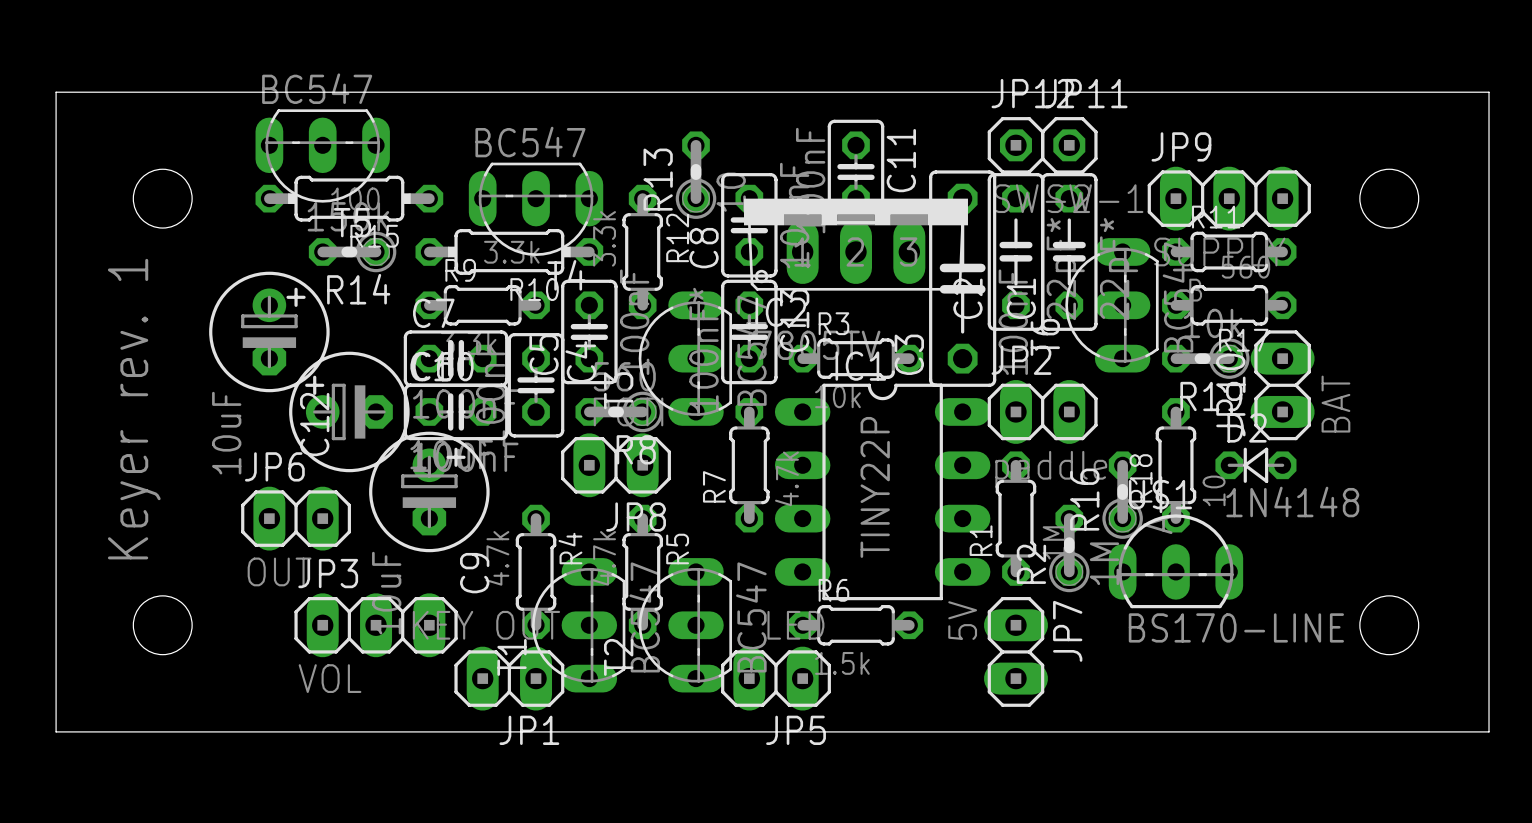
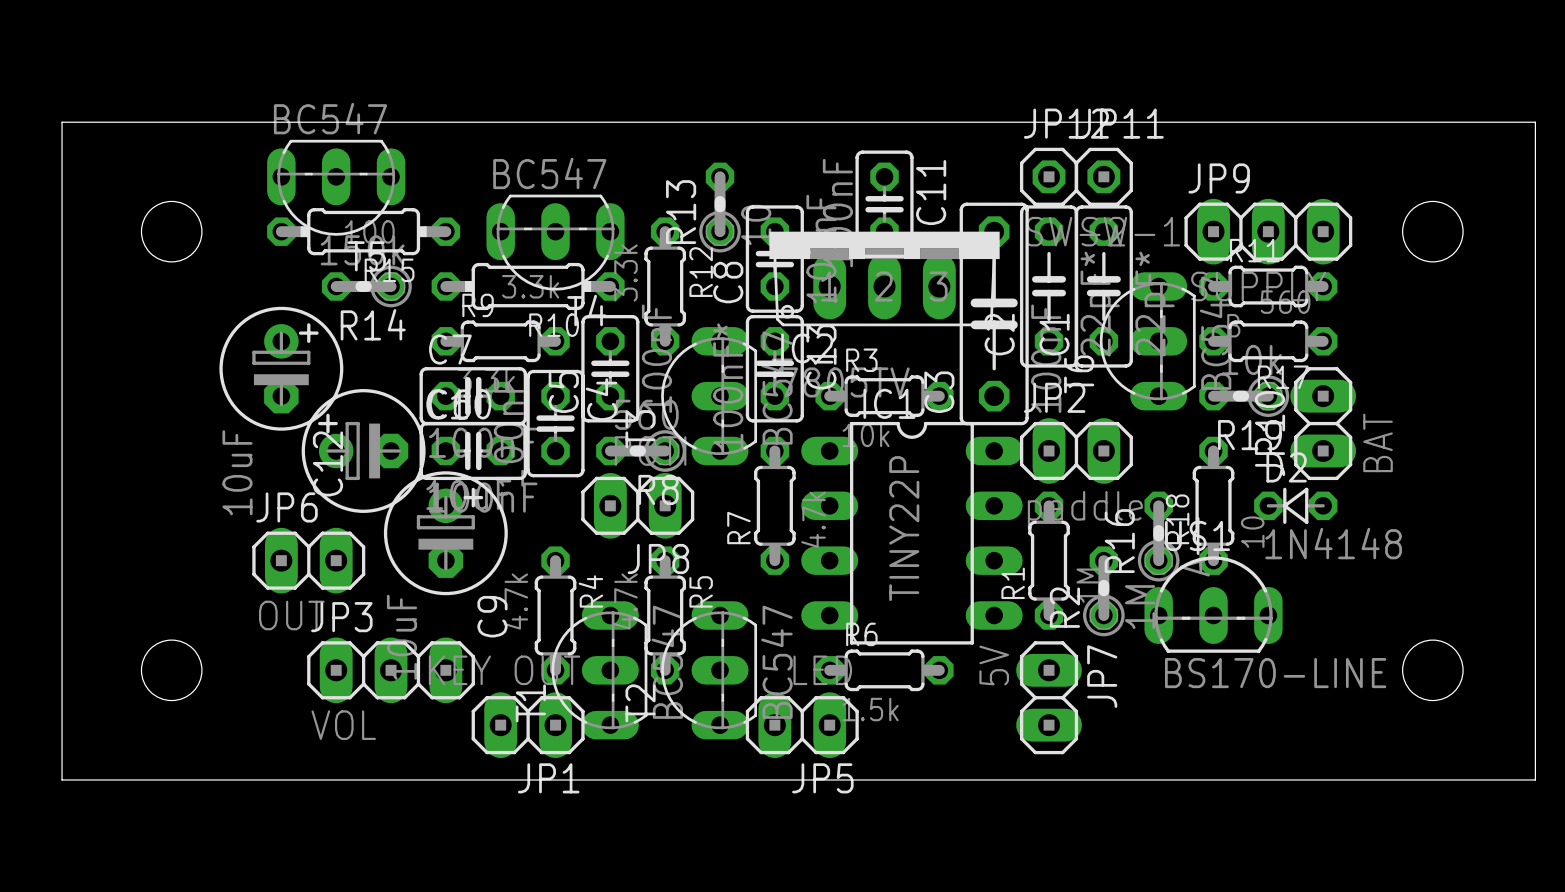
text: Keyer rev. 1 (134, 409) -> none

